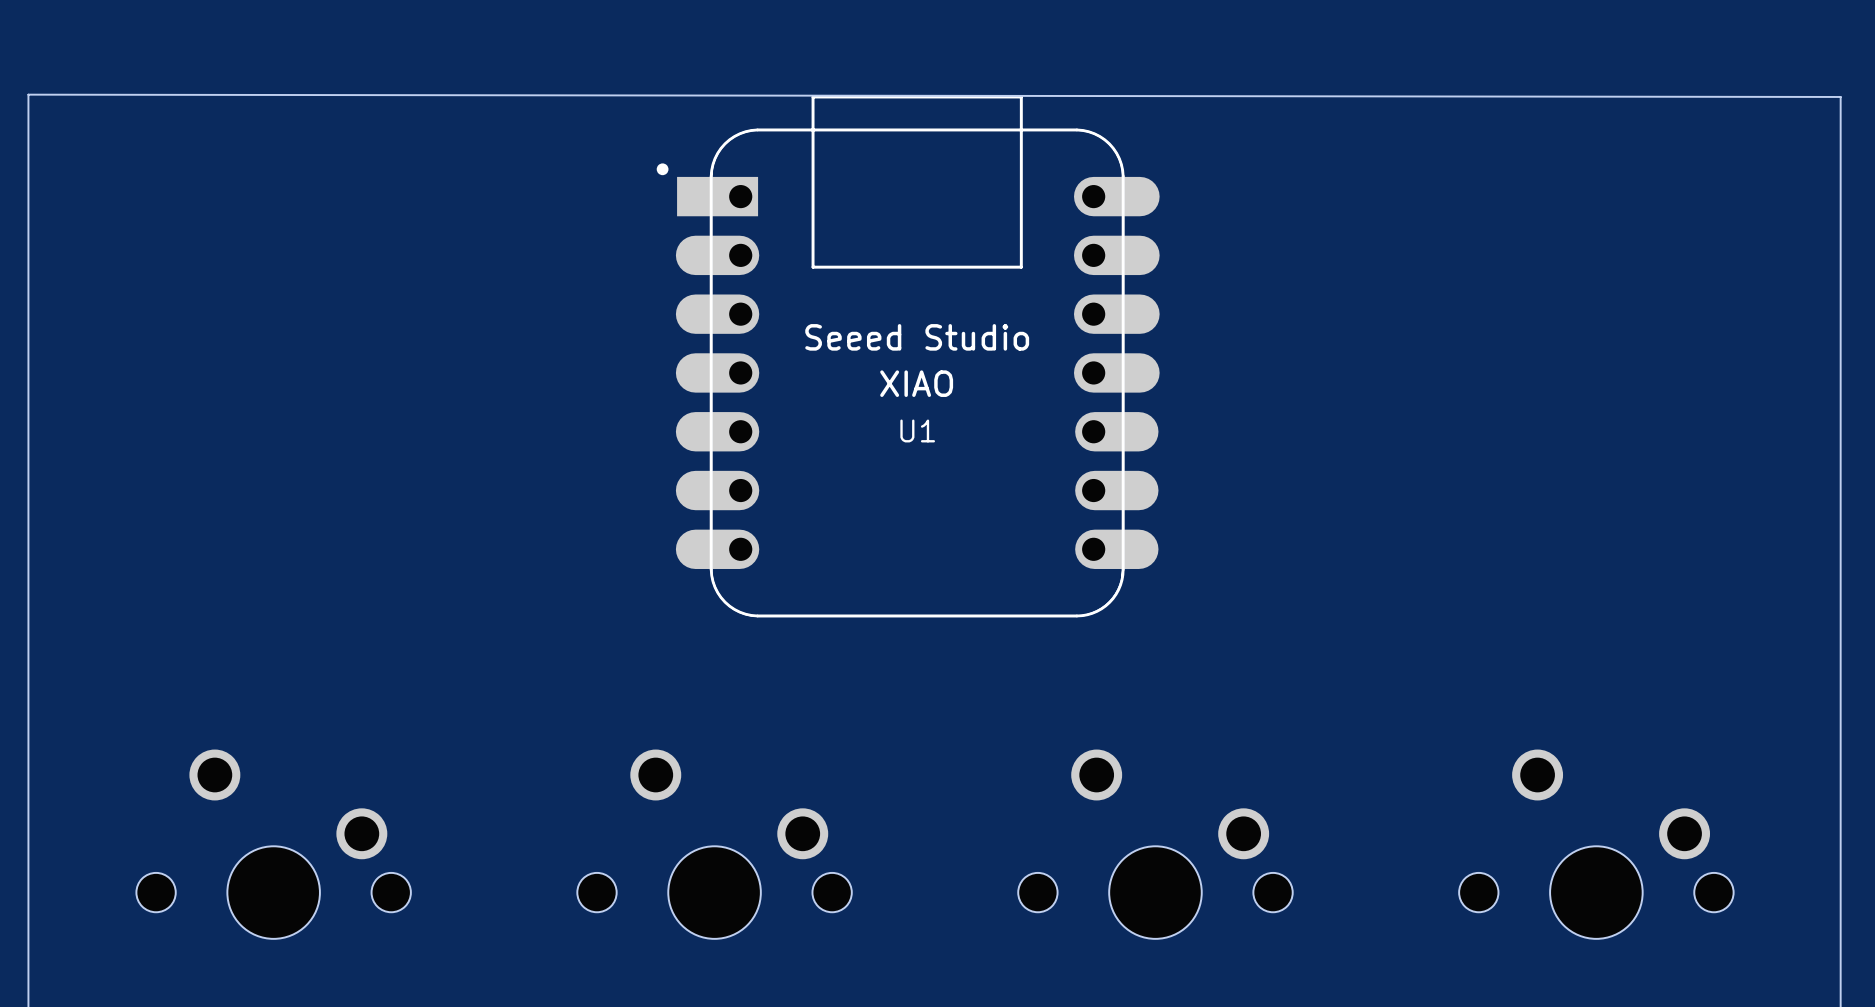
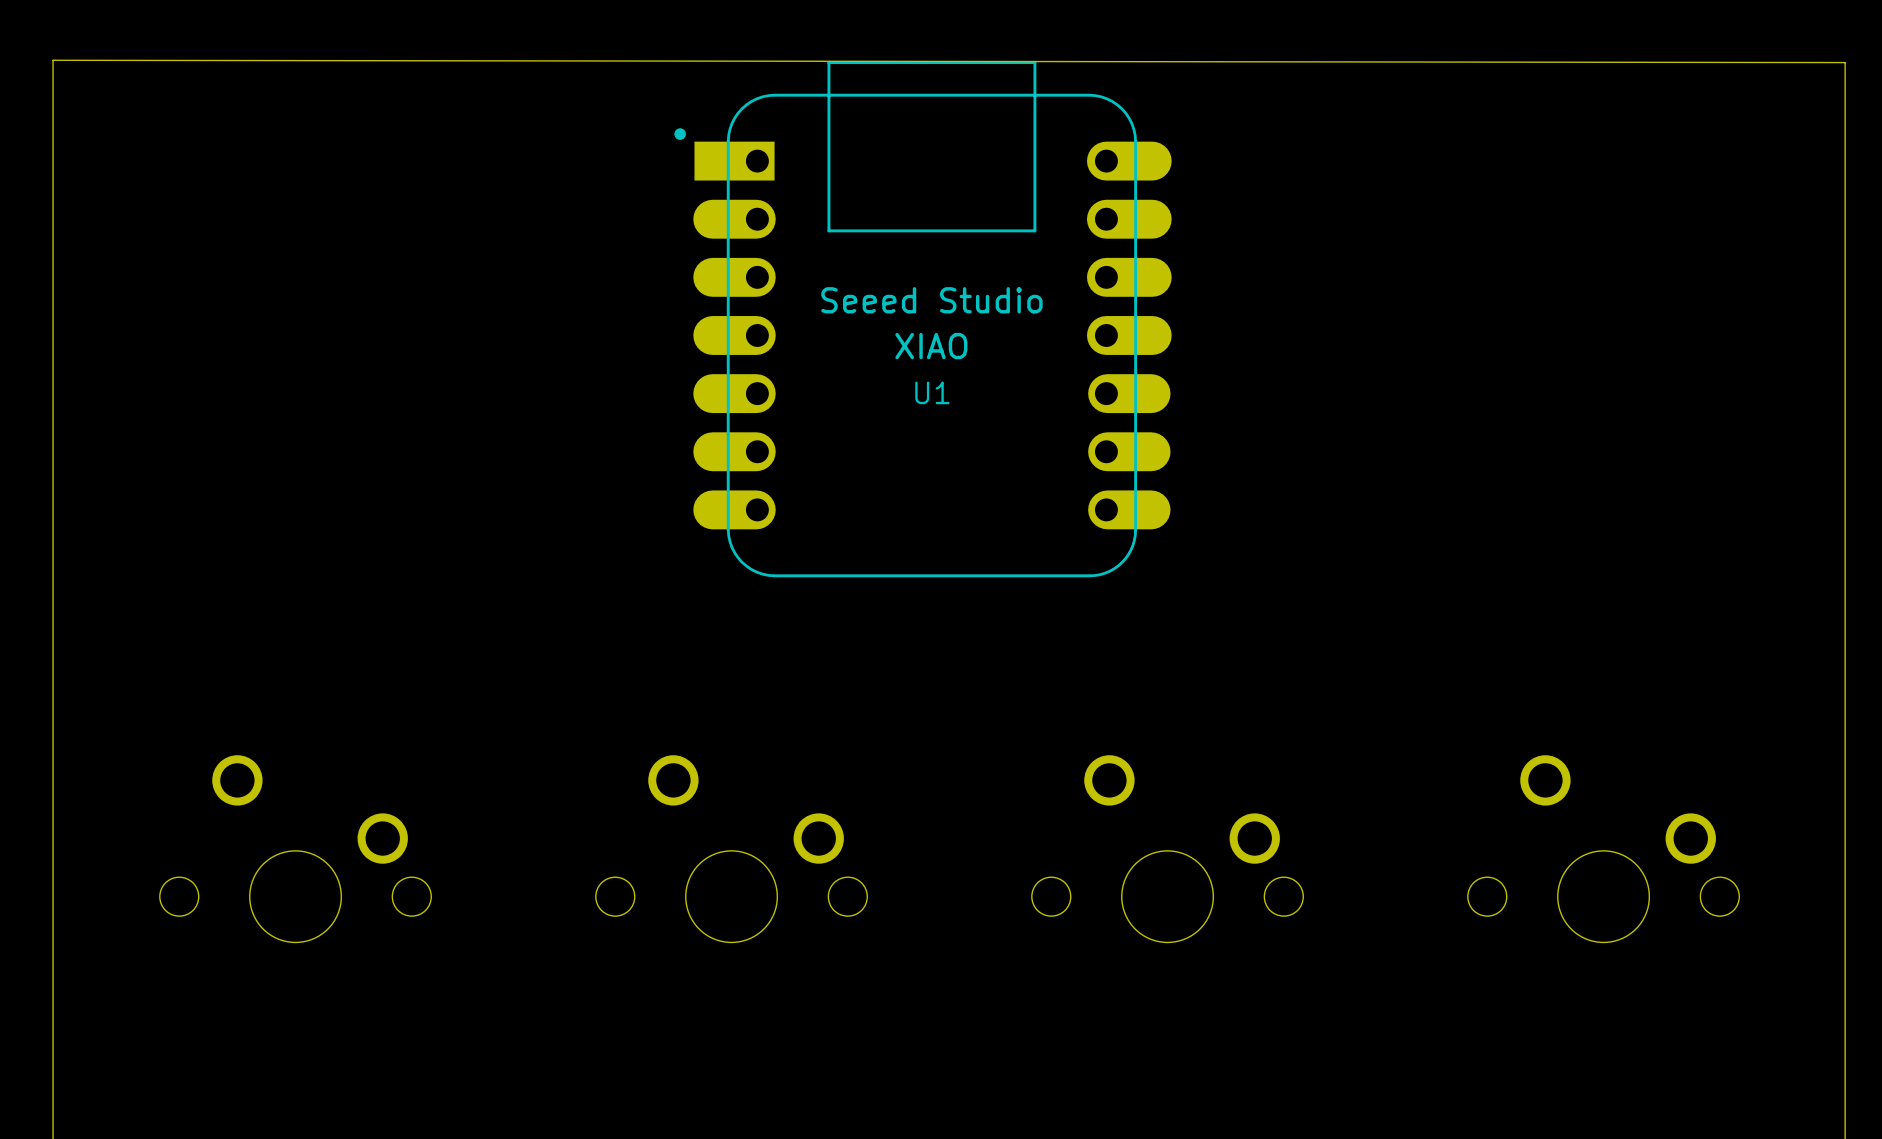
board edge: (28, 94) (1840, 96) -> (53, 107) (53, 60) (1845, 62) (1845, 109)
U1 position: (908, 356) -> (923, 319)

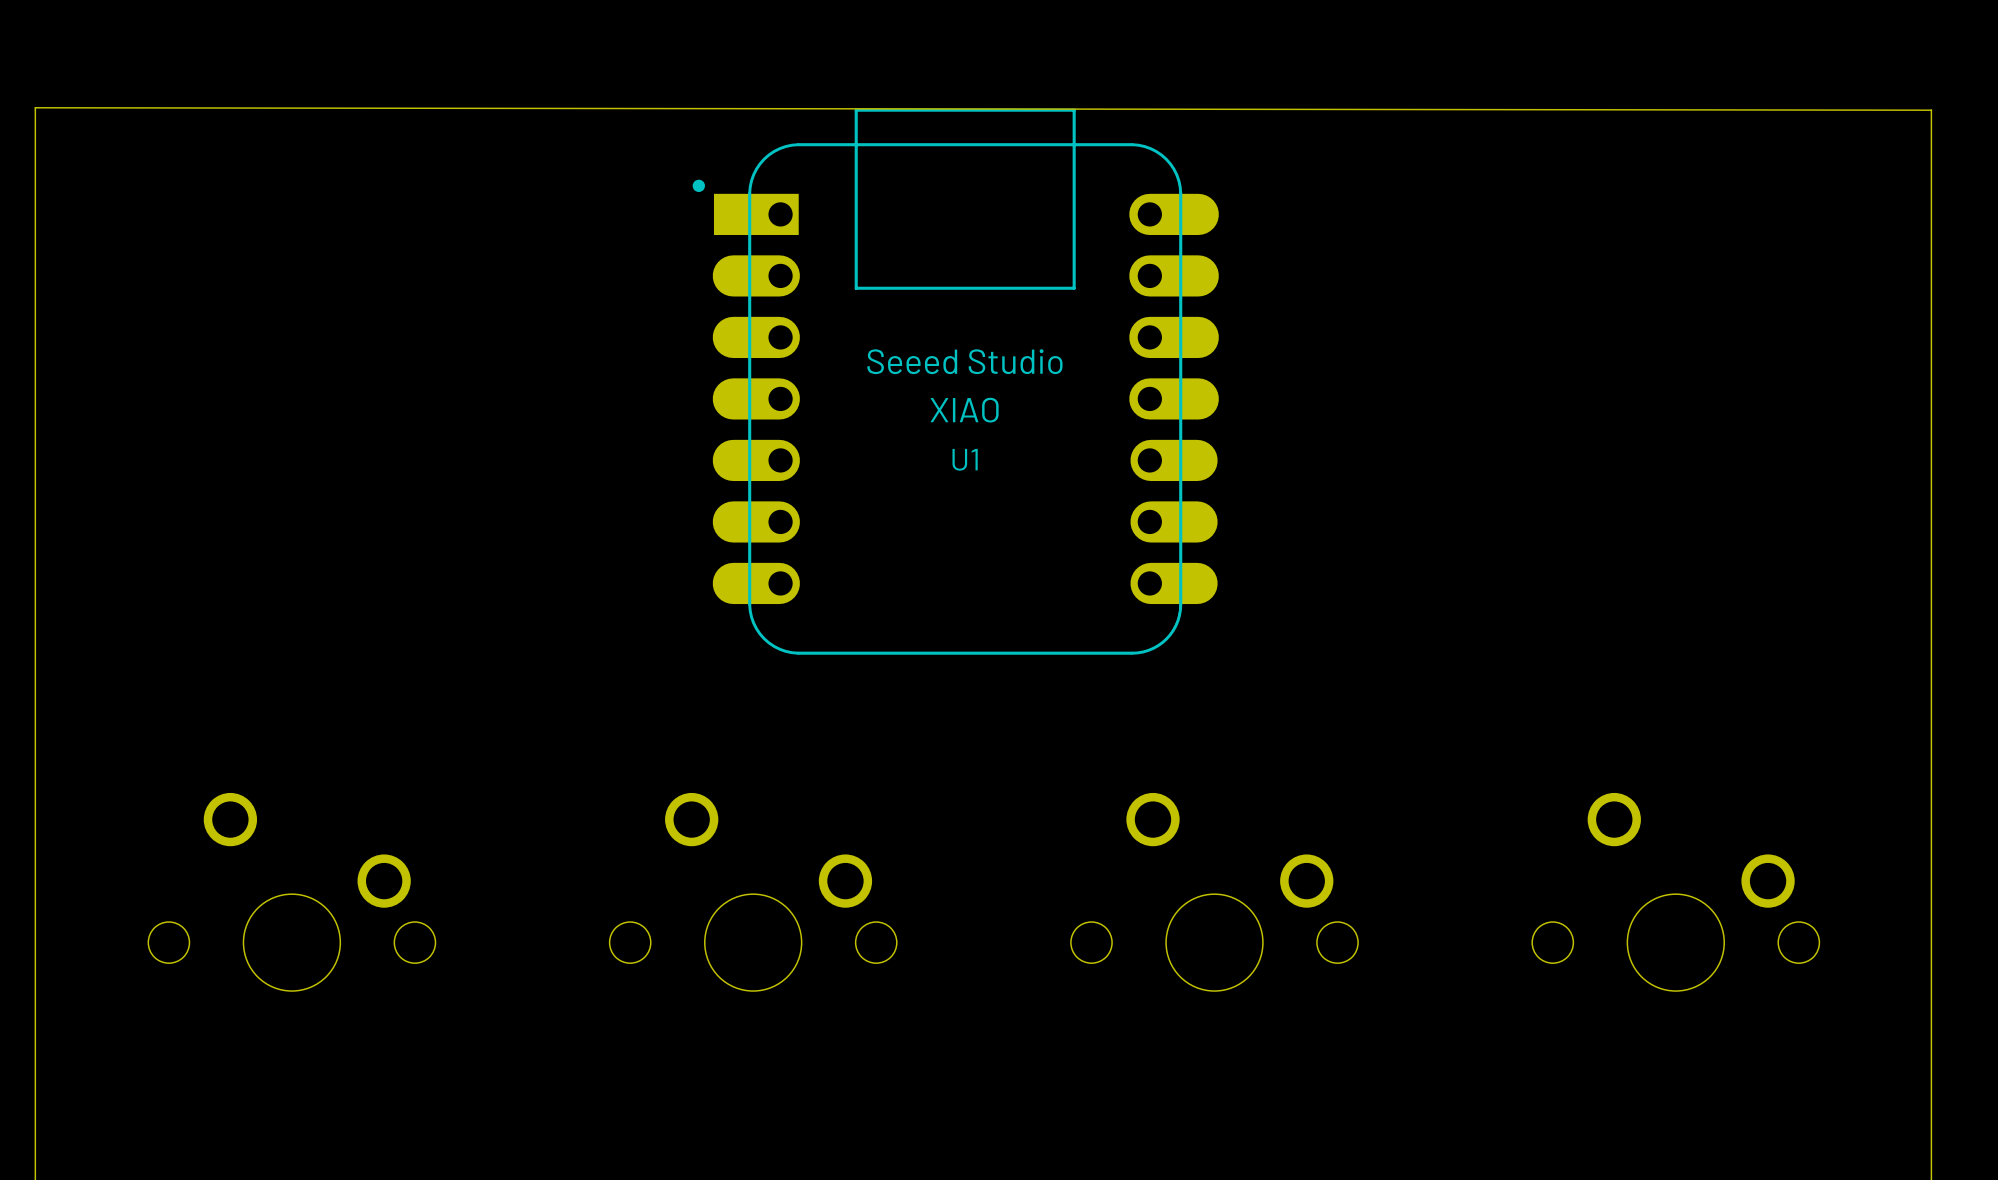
board edge: (53, 107) (53, 60) (1845, 62) (1845, 109) -> (35, 107) (1931, 110)
U1 position: (923, 319) -> (955, 381)

